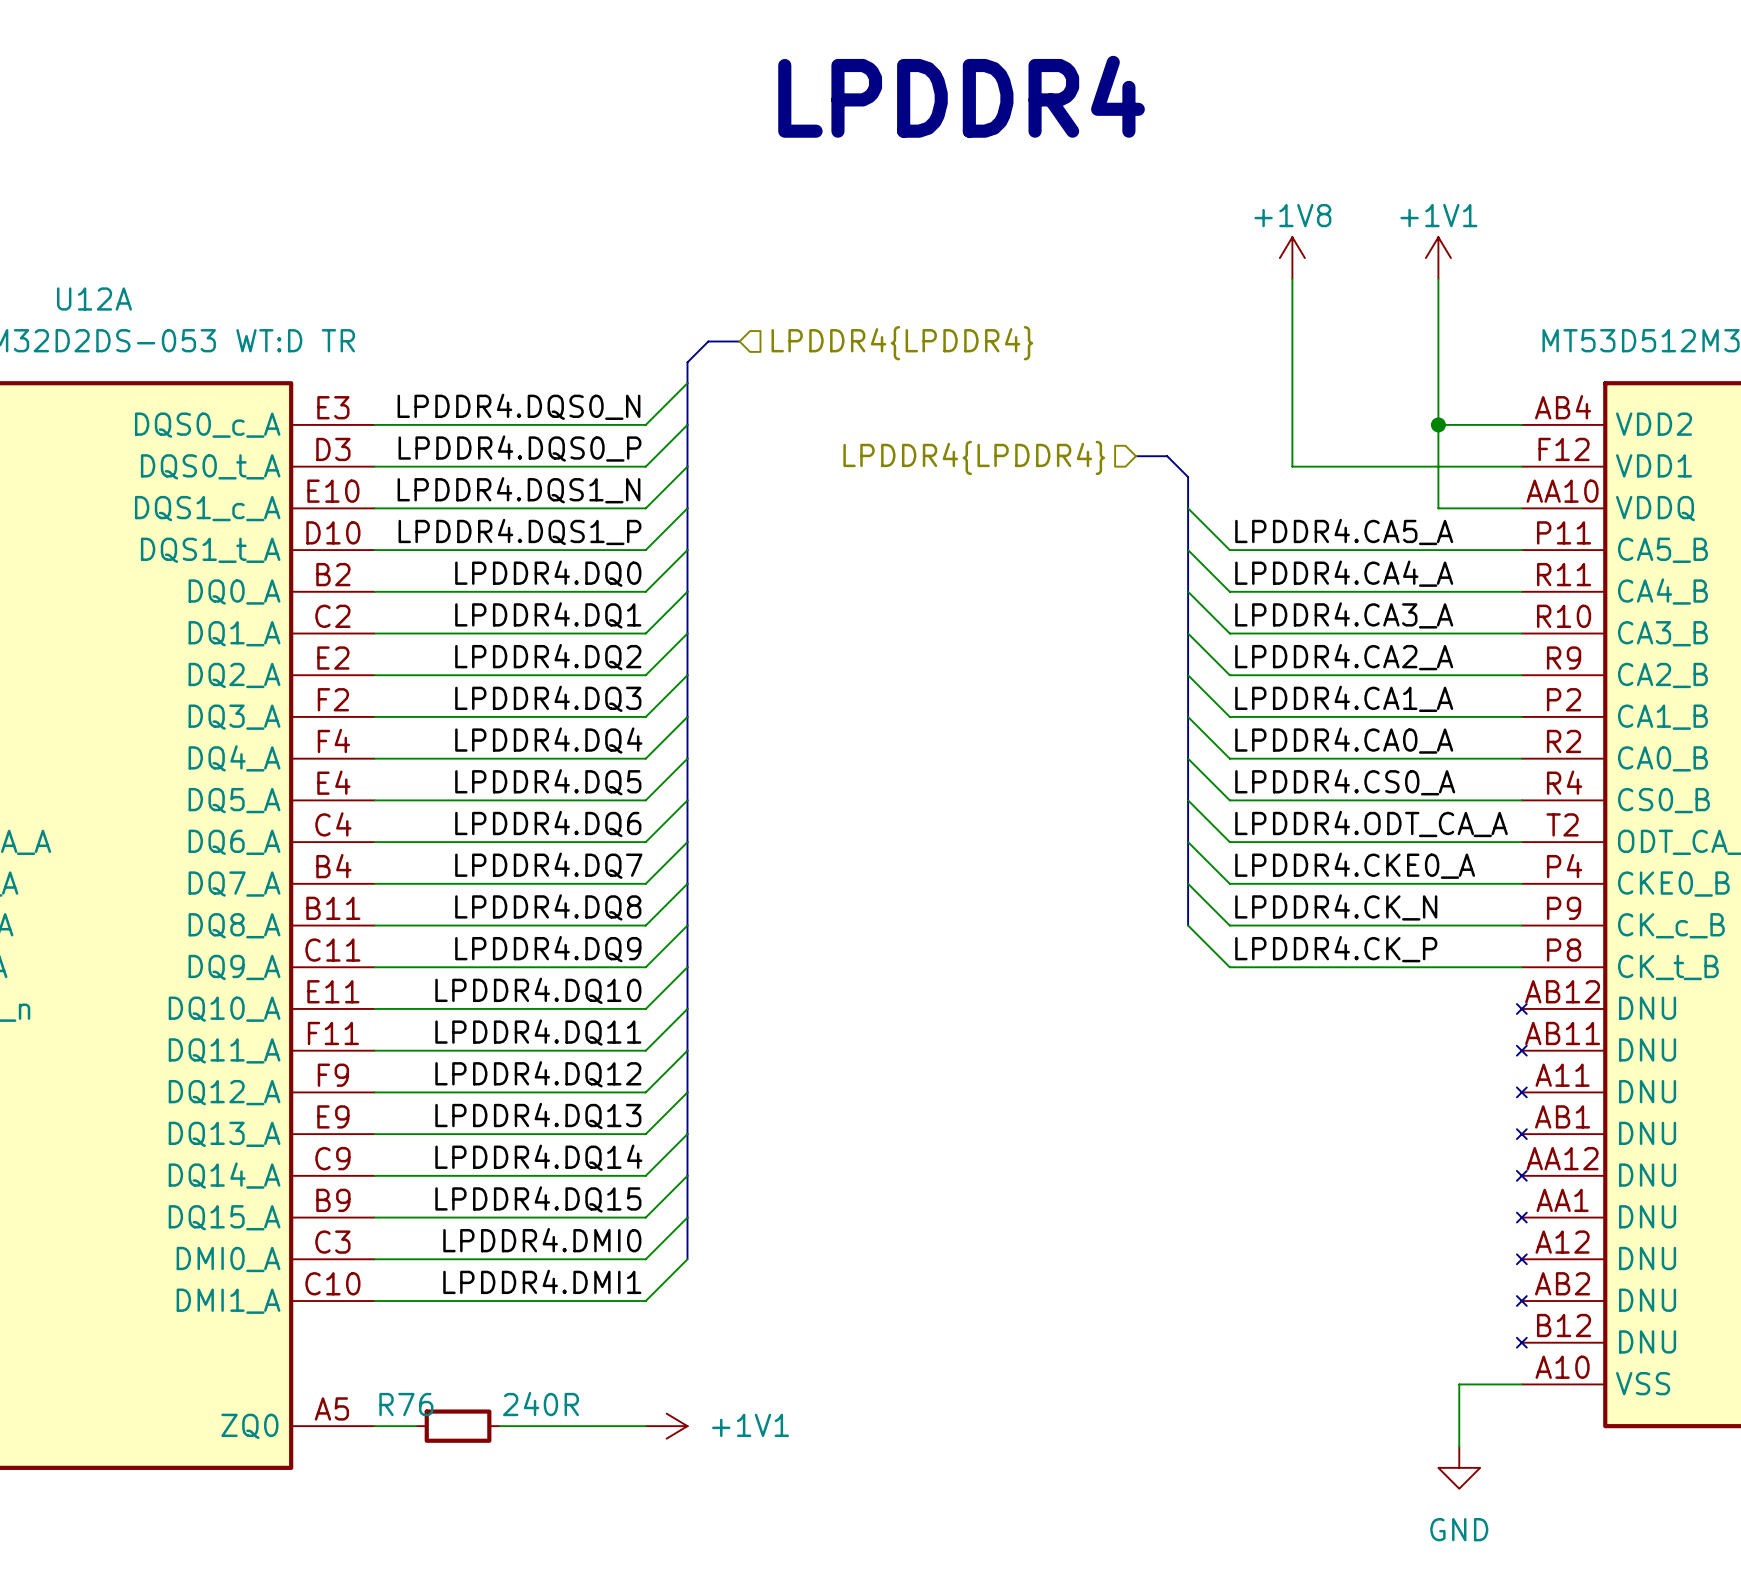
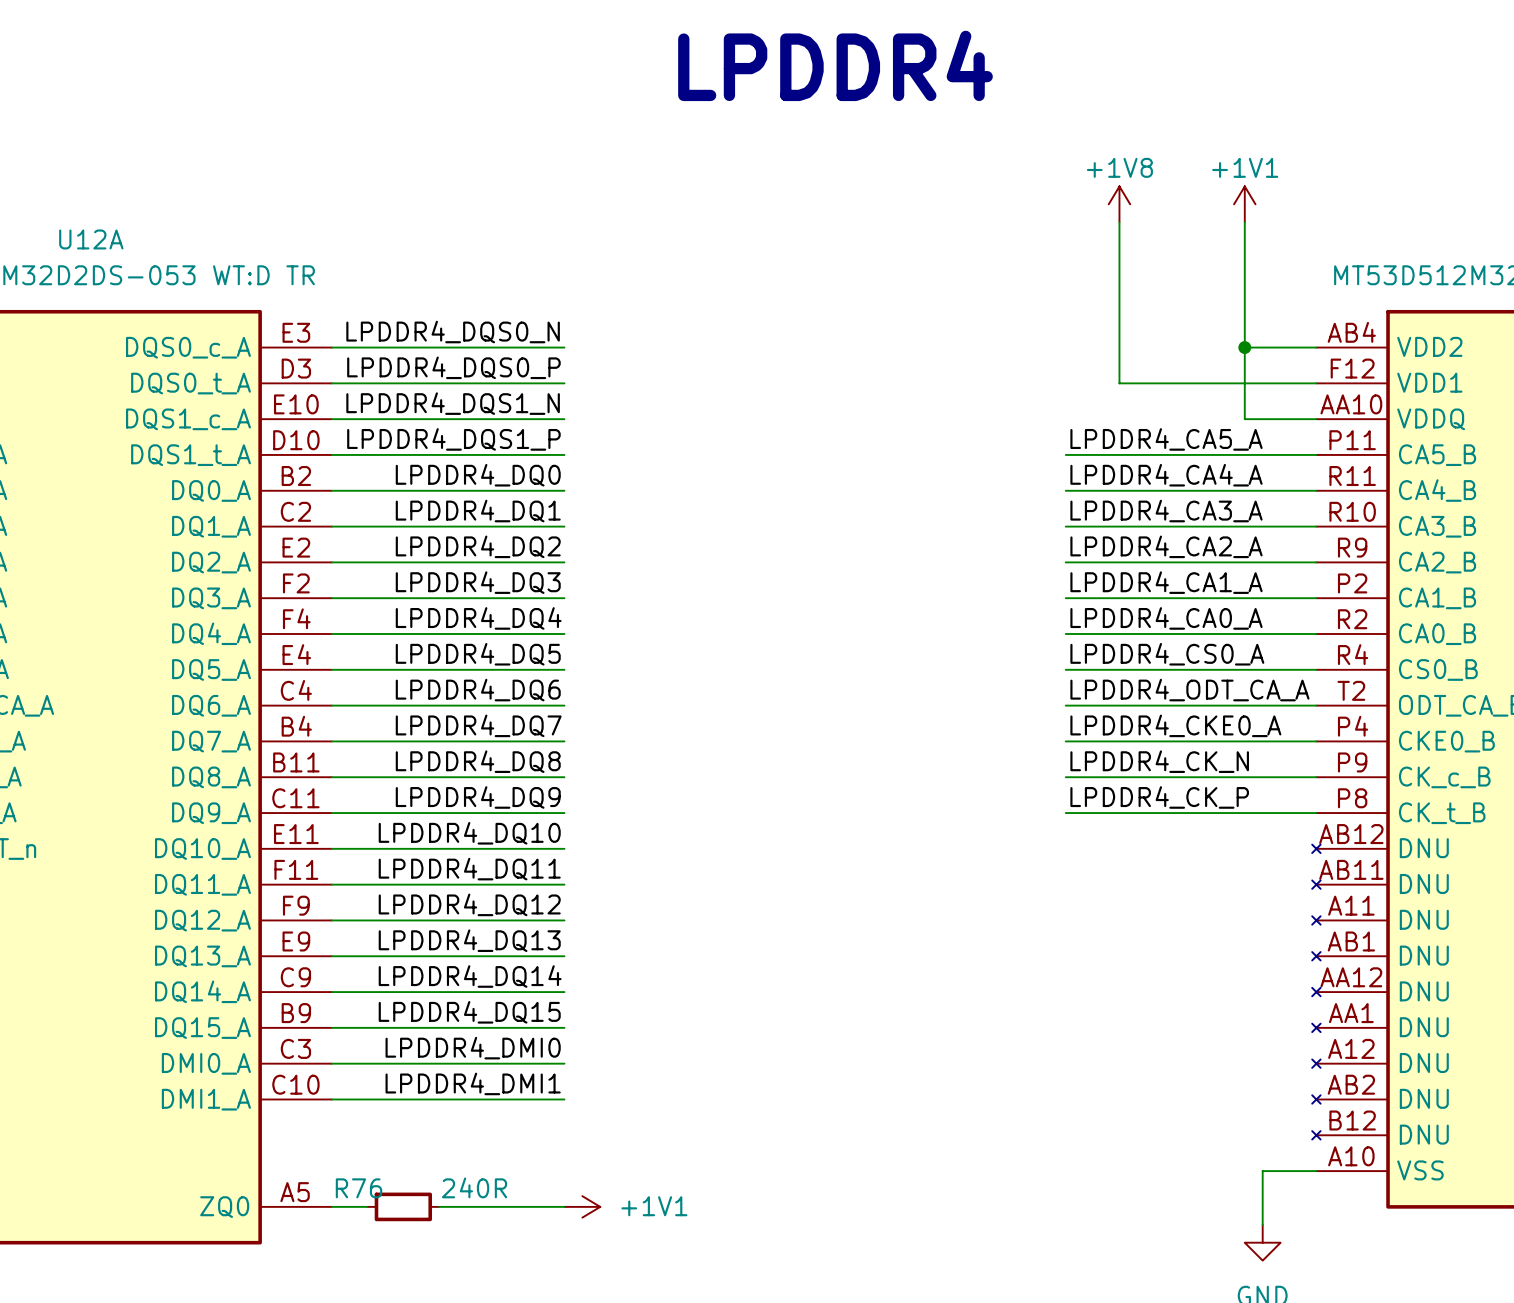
bus: (739, 341) (708, 341) (687, 362) (687, 1259) -> none
hierarchical label: LPDDR4{LPDDR4} (902, 343) -> none
wire: (687, 383) (645, 424) -> none
label: LPDDR4.DQS0_N (518, 406) -> LPDDR4_DQS0_N (453, 332)
wire: (687, 424) (645, 466) -> none
label: LPDDR4.DQS0_P (519, 448) -> LPDDR4_DQS0_P (453, 367)
bus: (1135, 456) (1167, 456) (1188, 477) (1188, 925) -> none
hierarchical label: LPDDR4{LPDDR4} (974, 457) -> none
wire: (687, 466) (645, 508) -> none
label: LPDDR4.DQS1_N (518, 490) -> LPDDR4_DQS1_N (453, 403)
wire: (687, 508) (645, 550) -> none
wire: (1188, 508) (1229, 550) -> none
label: LPDDR4.DQS1_P (519, 531) -> LPDDR4_DQS1_P (453, 439)
label: LPDDR4.CA5_A (1344, 531) -> LPDDR4_CA5_A (1166, 439)
wire: (687, 550) (645, 591) -> none
wire: (1188, 550) (1229, 591) -> none
label: LPDDR4.DQ0 (548, 573) -> LPDDR4_DQ0 (478, 475)
label: LPDDR4.CA4_A (1344, 573) -> LPDDR4_CA4_A (1166, 475)
wire: (687, 591) (645, 633) -> none
wire: (1188, 591) (1229, 633) -> none
label: LPDDR4.DQ1 (548, 615) -> LPDDR4_DQ1 (478, 511)
label: LPDDR4.CA3_A (1344, 615) -> LPDDR4_CA3_A (1166, 511)
wire: (687, 633) (645, 675) -> none
wire: (1188, 633) (1229, 675) -> none
label: LPDDR4.DQ2 (548, 657) -> LPDDR4_DQ2 (478, 546)
label: LPDDR4.CA2_A (1344, 657) -> LPDDR4_CA2_A (1166, 546)
wire: (687, 675) (645, 716) -> none
wire: (1188, 675) (1229, 716) -> none
label: LPDDR4.DQ3 (548, 698) -> LPDDR4_DQ3 (478, 582)
label: LPDDR4.CA1_A (1344, 698) -> LPDDR4_CA1_A (1166, 582)
wire: (687, 716) (645, 758) -> none
wire: (1188, 716) (1229, 758) -> none
label: LPDDR4.DQ4 (548, 740) -> LPDDR4_DQ4 (478, 618)
label: LPDDR4.CA0_A (1344, 740) -> LPDDR4_CA0_A (1166, 618)
wire: (687, 758) (645, 800) -> none
wire: (1188, 758) (1229, 800) -> none
label: LPDDR4.DQ5 (548, 782) -> LPDDR4_DQ5 (478, 654)
label: LPDDR4.CS0_A (1345, 782) -> LPDDR4_CS0_A (1167, 654)
wire: (687, 800) (645, 842) -> none
wire: (1188, 800) (1229, 842) -> none
label: LPDDR4.DQ6 (548, 823) -> LPDDR4_DQ6 (478, 690)
label: LPDDR4.ODT_CA_A (1371, 823) -> LPDDR4_ODT_CA_A (1189, 690)
wire: (687, 842) (645, 883) -> none
wire: (1188, 842) (1229, 883) -> none
label: LPDDR4.DQ7 (548, 865) -> LPDDR4_DQ7 (478, 725)
label: LPDDR4.CKE0_A (1355, 865) -> LPDDR4_CKE0_A (1175, 725)
wire: (687, 883) (645, 925) -> none
wire: (1188, 883) (1229, 925) -> none
label: LPDDR4.DQ8 (548, 907) -> LPDDR4_DQ8 (478, 761)
label: LPDDR4.CK_N (1336, 907) -> LPDDR4_CK_N (1159, 761)
wire: (687, 925) (645, 967) -> none
wire: (1188, 925) (1229, 967) -> none
label: LPDDR4.DQ9 (548, 949) -> LPDDR4_DQ9 (478, 797)
label: LPDDR4.CK_P (1336, 949) -> LPDDR4_CK_P (1159, 797)
wire: (687, 967) (645, 1008) -> none
label: LPDDR4.DQ10 (538, 990) -> LPDDR4_DQ10 (469, 833)
wire: (687, 1008) (645, 1050) -> none
label: LPDDR4.DQ11 (538, 1032) -> LPDDR4_DQ11 (469, 869)
wire: (687, 1050) (645, 1092) -> none
label: LPDDR4.DQ12 (538, 1074) -> LPDDR4_DQ12 (469, 904)
wire: (687, 1092) (645, 1134) -> none
label: LPDDR4.DQ13 (538, 1116) -> LPDDR4_DQ13 (469, 940)
wire: (687, 1134) (645, 1175) -> none
label: LPDDR4.DQ14 (538, 1157) -> LPDDR4_DQ14 (470, 976)
wire: (687, 1175) (645, 1217) -> none
label: LPDDR4.DQ15 (538, 1199) -> LPDDR4_DQ15 (469, 1012)
wire: (687, 1217) (645, 1259) -> none
label: LPDDR4.DMI0 (542, 1240) -> LPDDR4_DMI0 (473, 1048)
wire: (687, 1259) (645, 1301) -> none
label: LPDDR4.DMI1 (542, 1281) -> LPDDR4_DMI1 (473, 1083)

